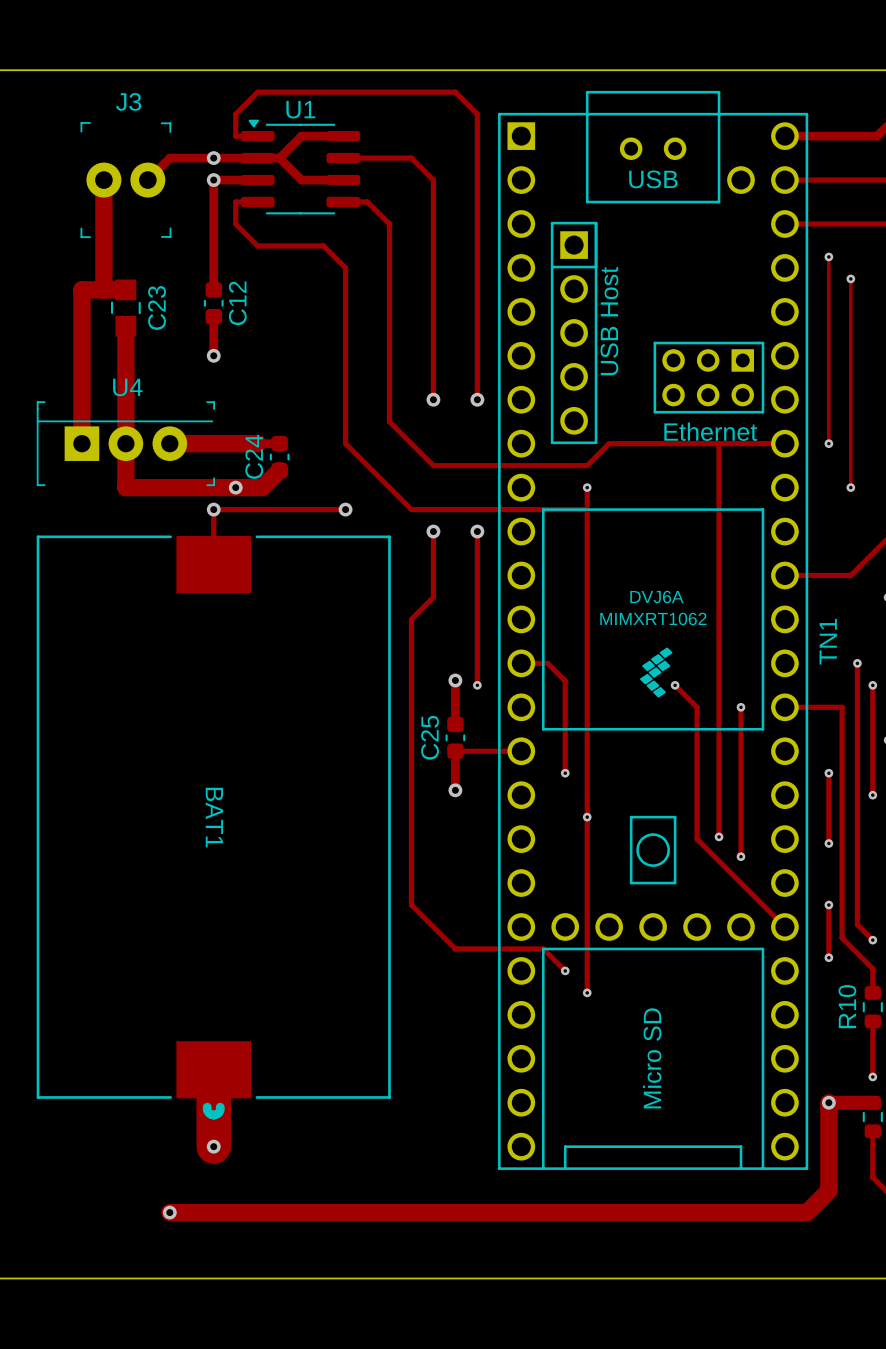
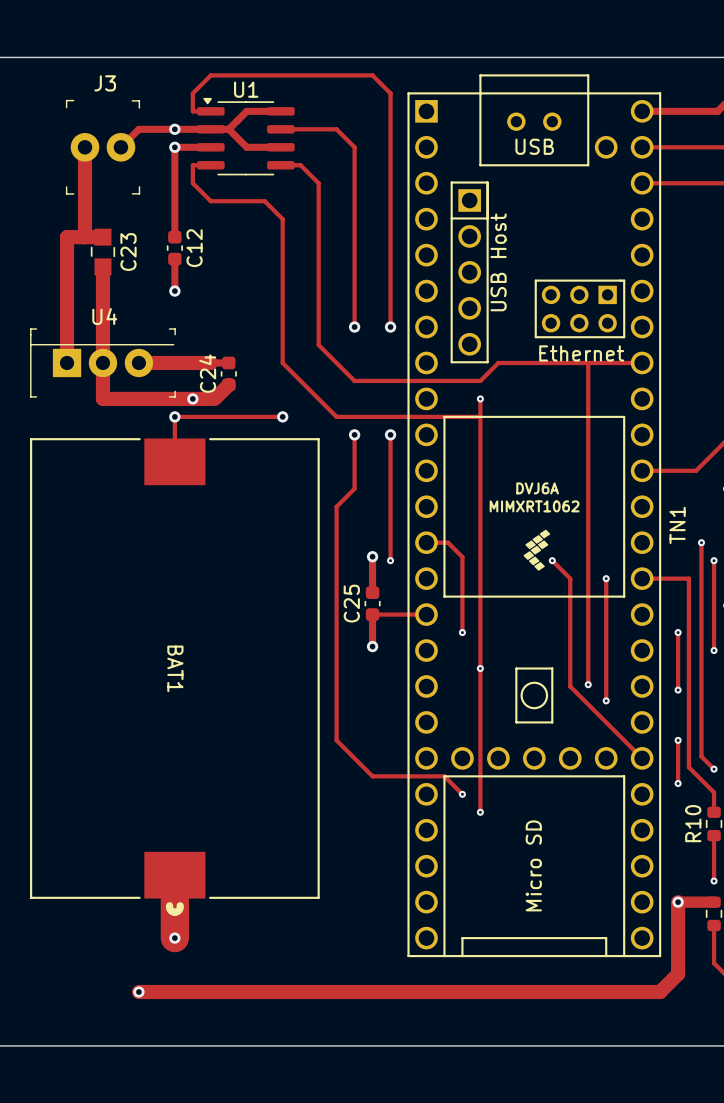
track: (828, 256) (828, 443) -> none
via: (828, 256) -> none
track: (850, 278) (850, 487) -> none
via: (850, 278) -> none
via: (828, 443) -> none
via: (850, 487) -> none

